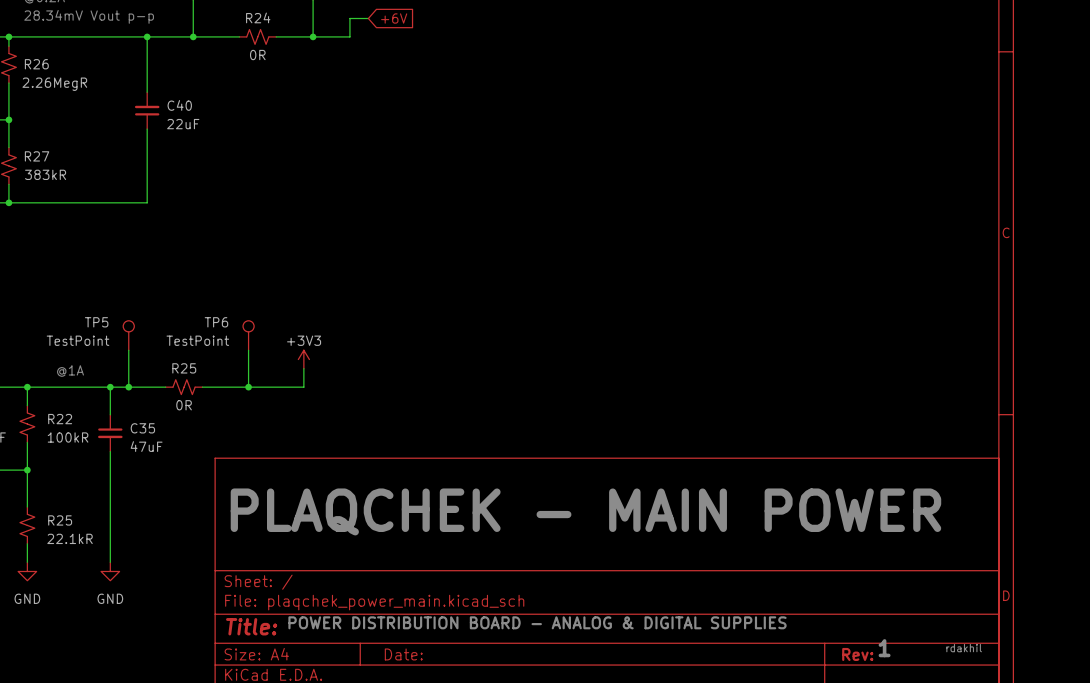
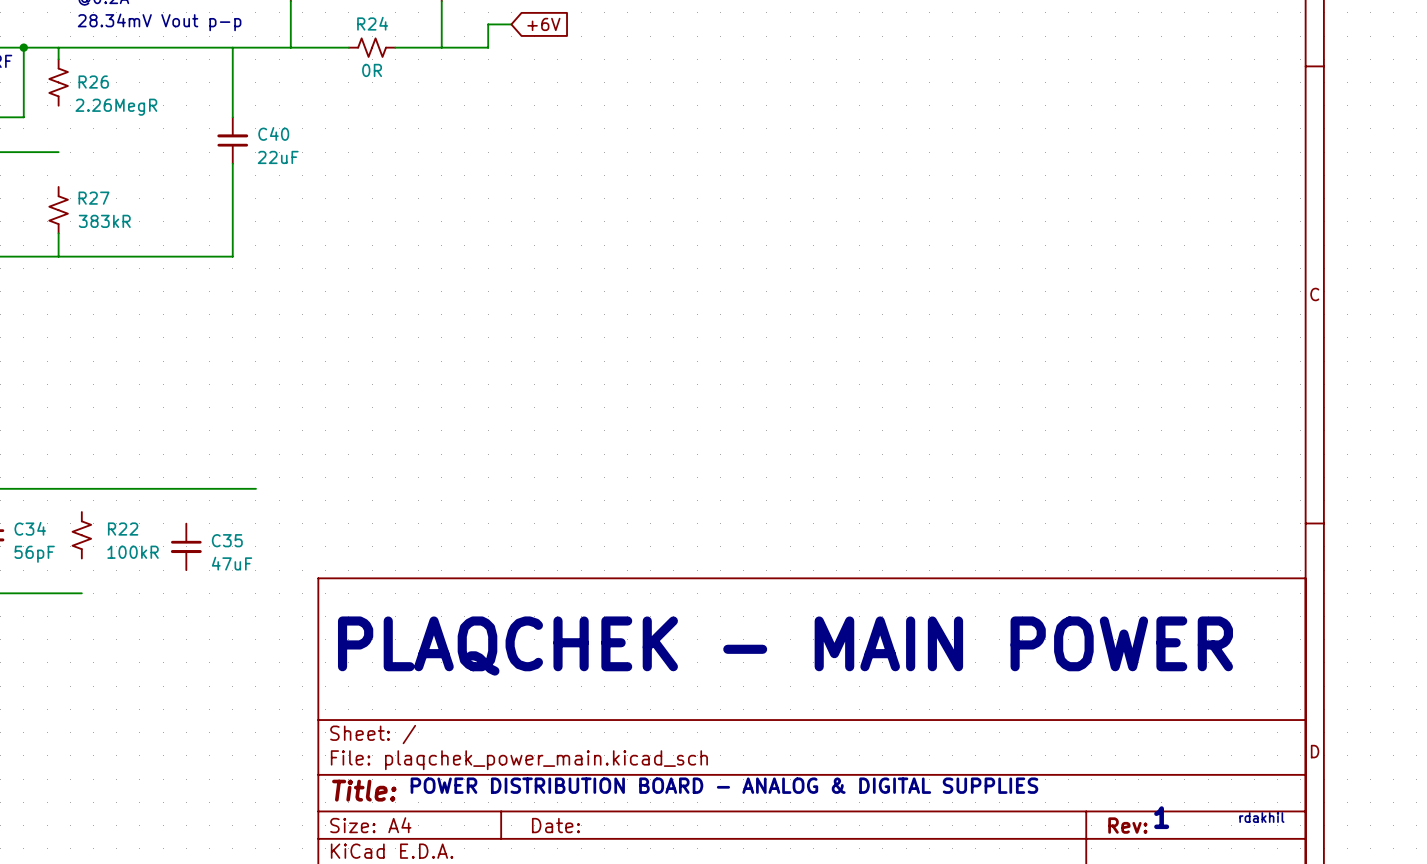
junction: (8, 36) -> none
junction: (147, 36) -> none
junction: (193, 36) -> none
junction: (313, 36) -> none
wire: (8, 83) (8, 147) -> none
junction: (8, 119) -> none
junction: (8, 202) -> none
TP5: TestPoint (128, 335) -> none
TP6: TestPoint (248, 335) -> none
wire: (128, 350) (128, 387) -> none
wire: (248, 350) (248, 387) -> none
power symbol: +3V3 (303, 359) -> none
wire: (303, 368) (303, 387) (202, 387) -> none
text: @1A (70, 371) -> none
wire: (27, 387) (27, 405) -> none
junction: (27, 387) -> none
wire: (110, 387) (110, 414) -> none
junction: (110, 387) -> none
junction: (128, 387) -> none
R25: 0R (184, 387) -> none
junction: (248, 387) -> none
wire: (27, 442) (27, 506) -> none
wire: (110, 451) (110, 562) -> none
junction: (27, 470) -> none
R25: 22.1kR (27, 525) -> none
wire: (27, 543) (27, 562) -> none
power symbol: GND (27, 571) -> none
power symbol: GND (110, 571) -> none

